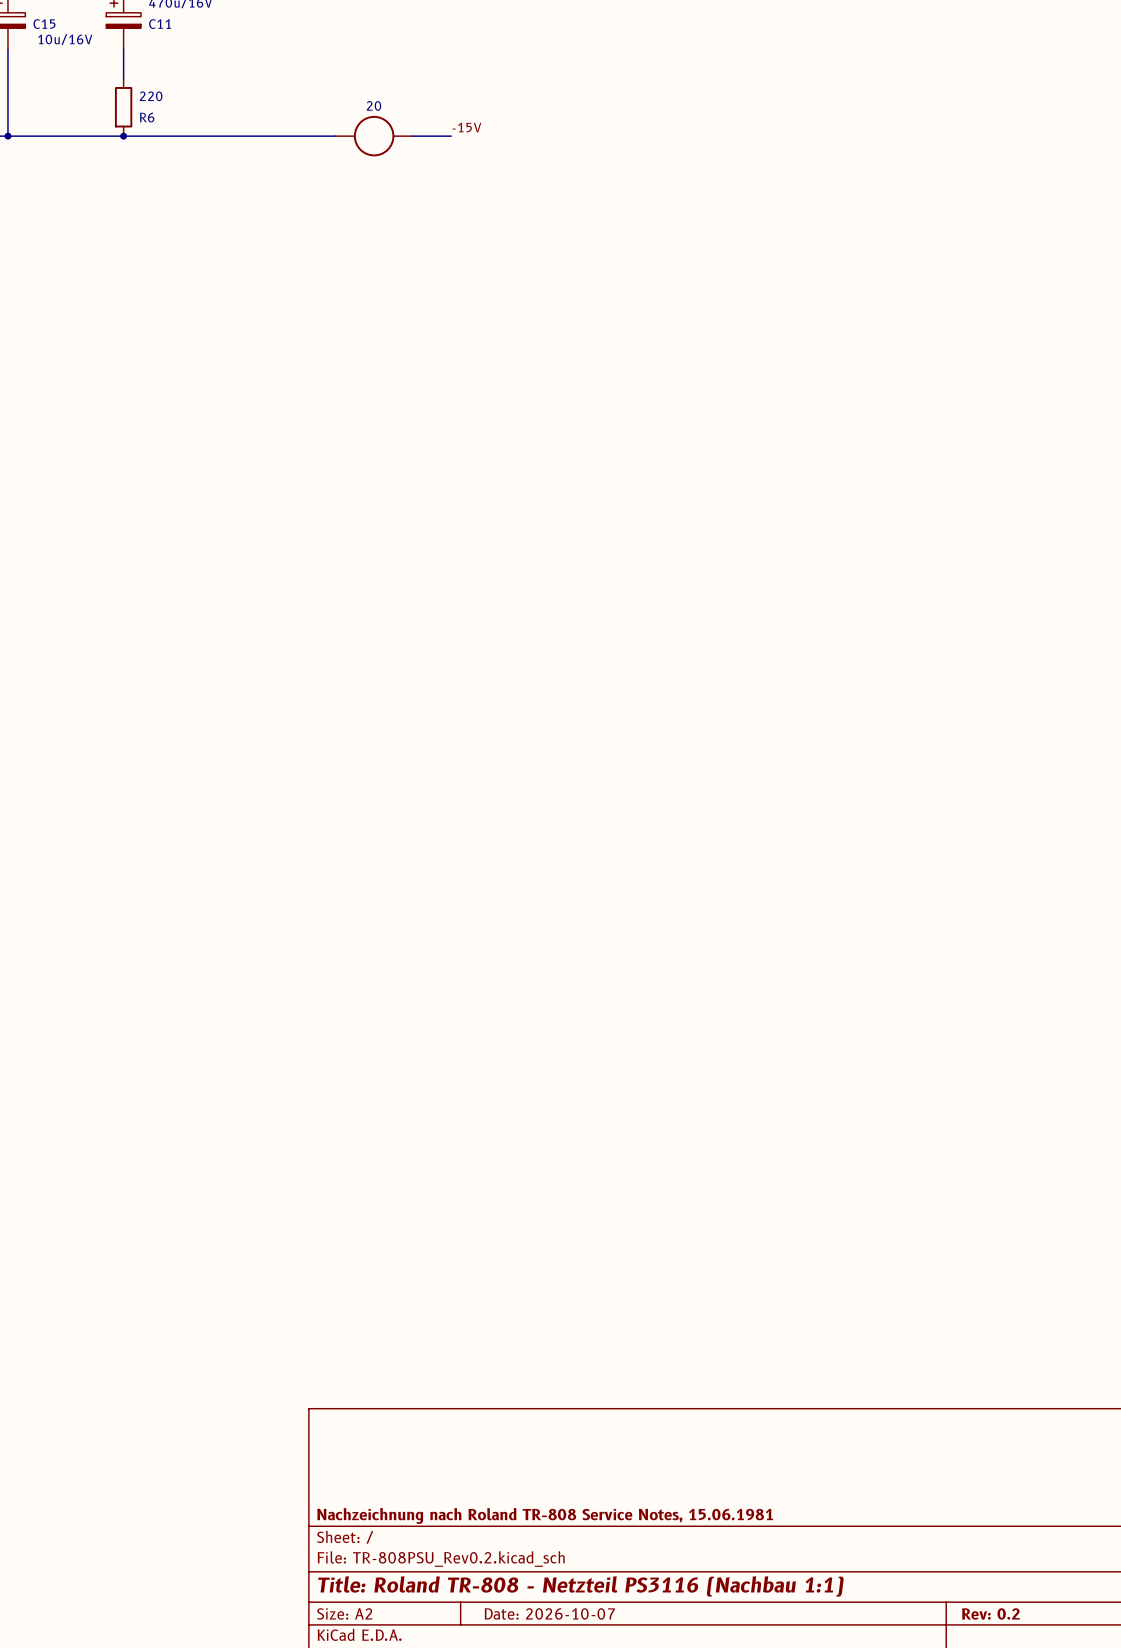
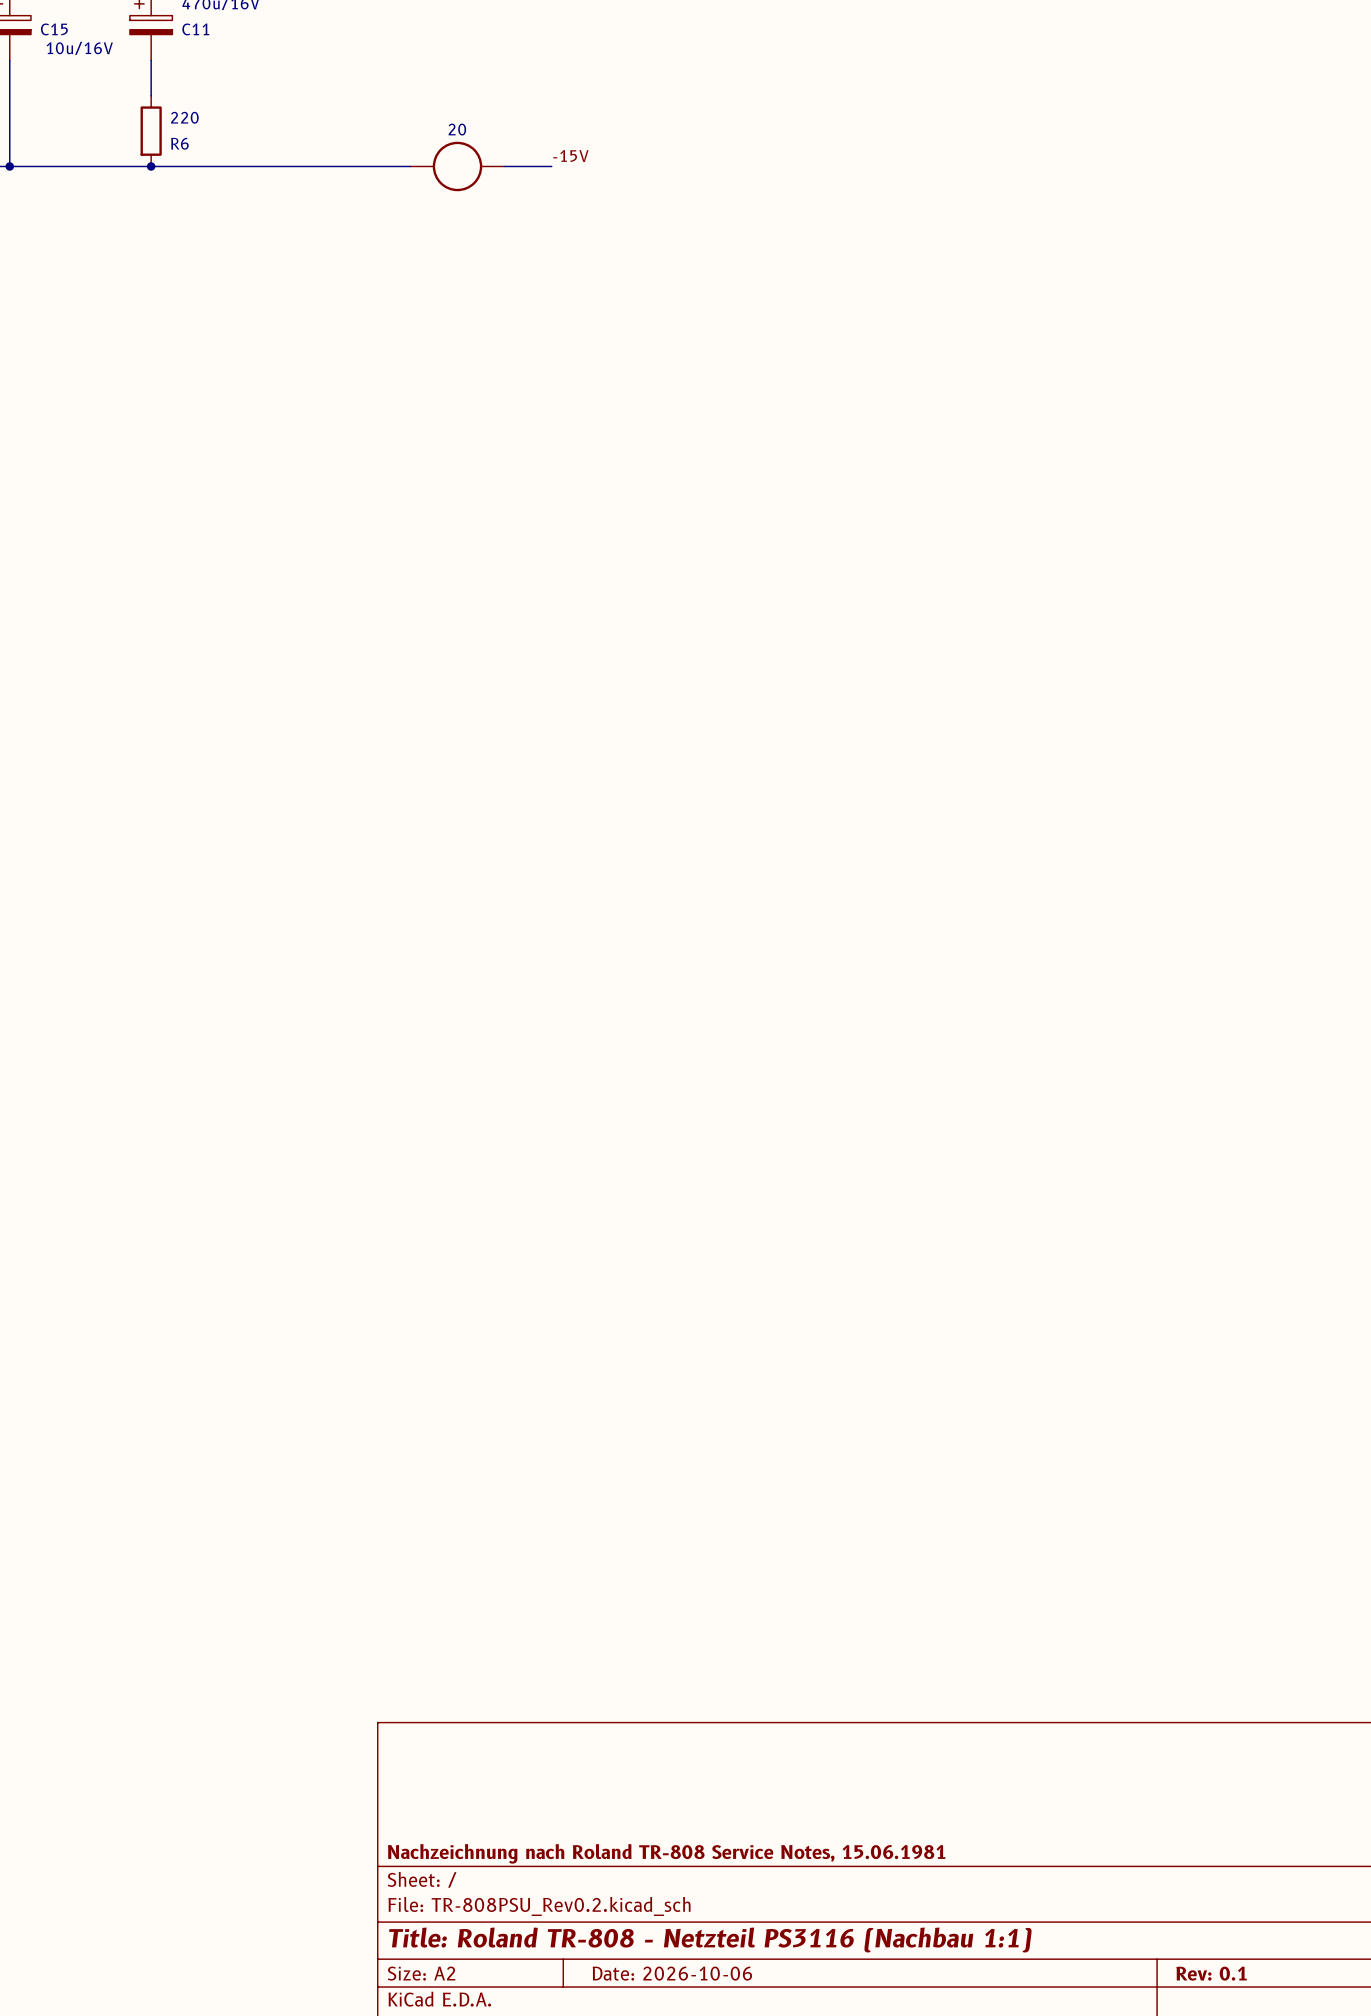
title block: Date: 2026-10-07 (549, 1613) -> Date: 2026-10-06 (672, 1973)
title block: Rev: 0.2 (990, 1613) -> Rev: 0.1 (1211, 1973)

